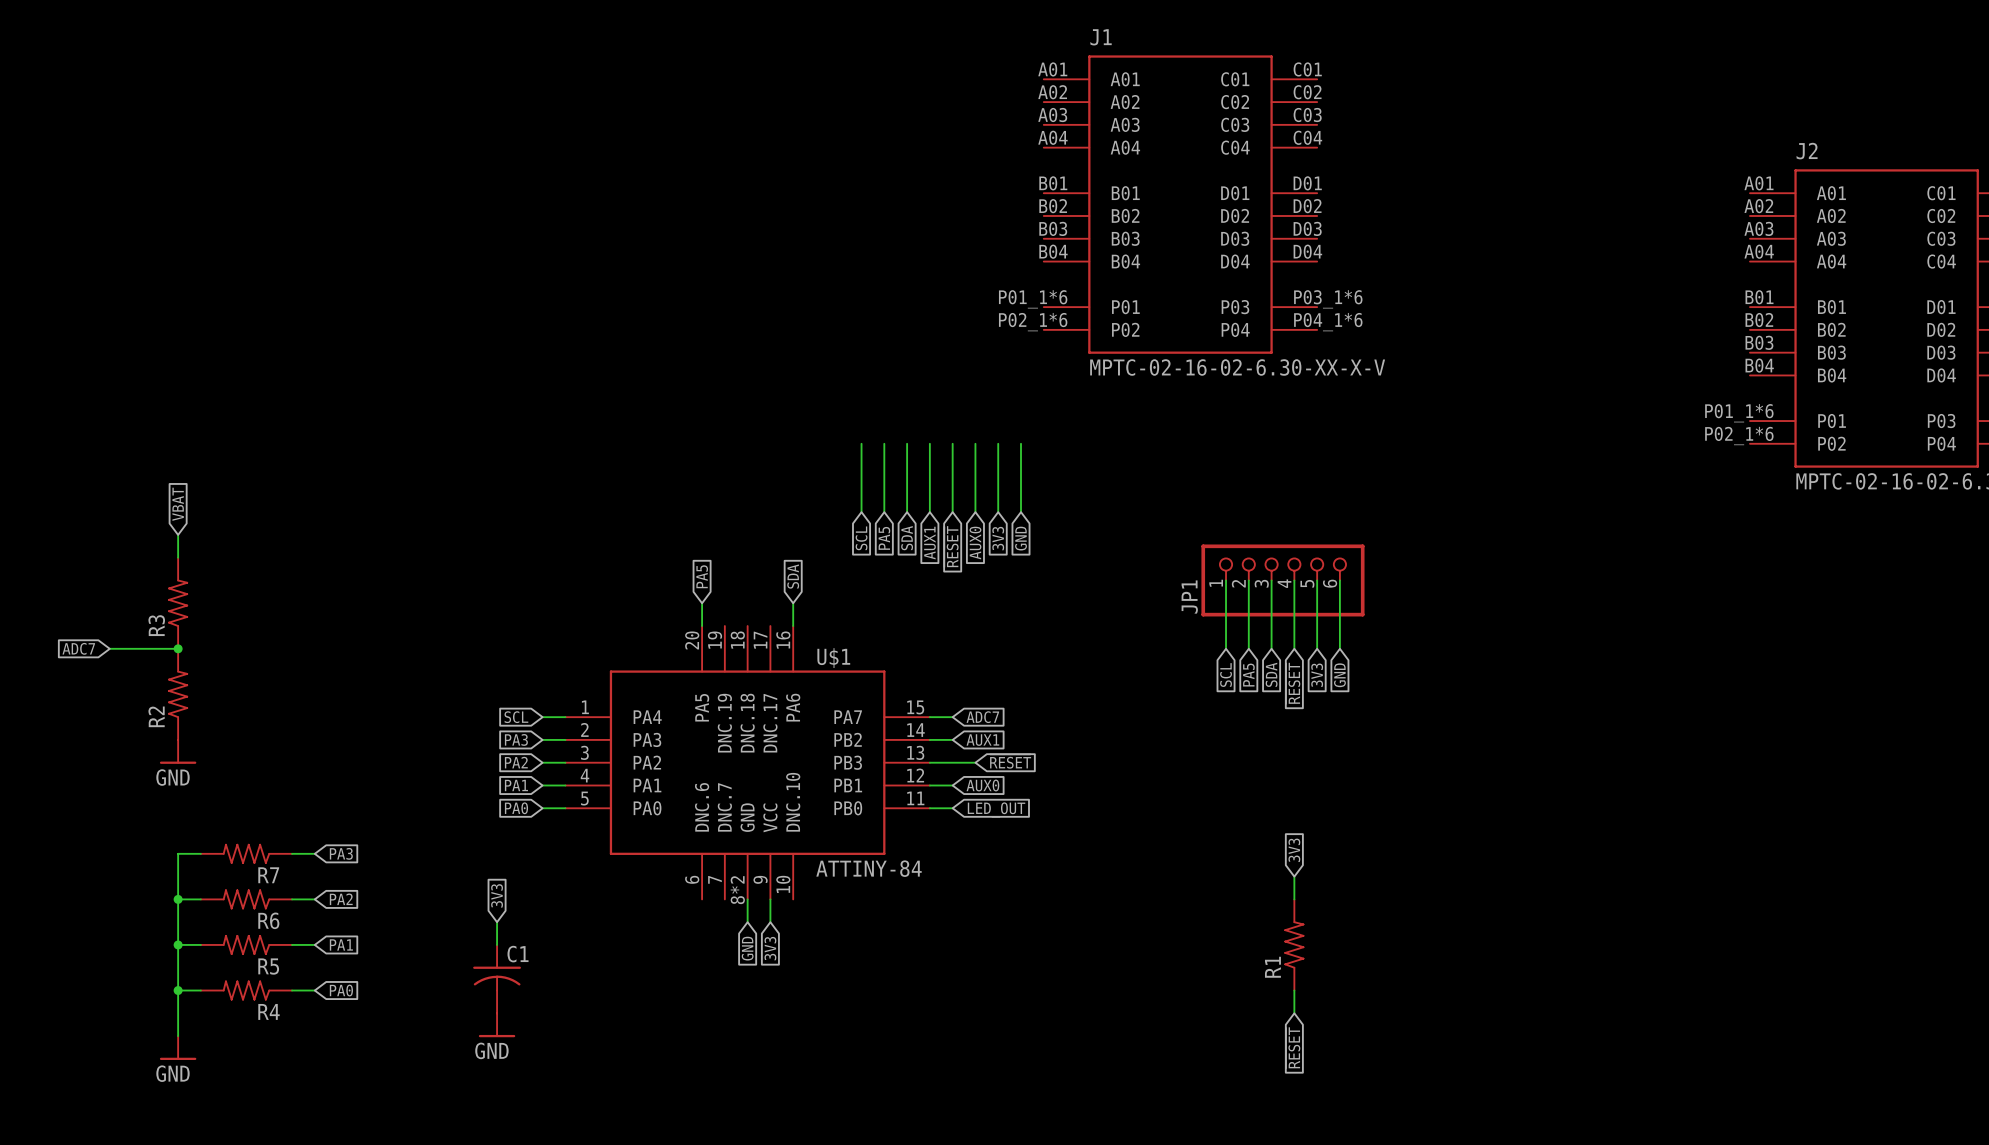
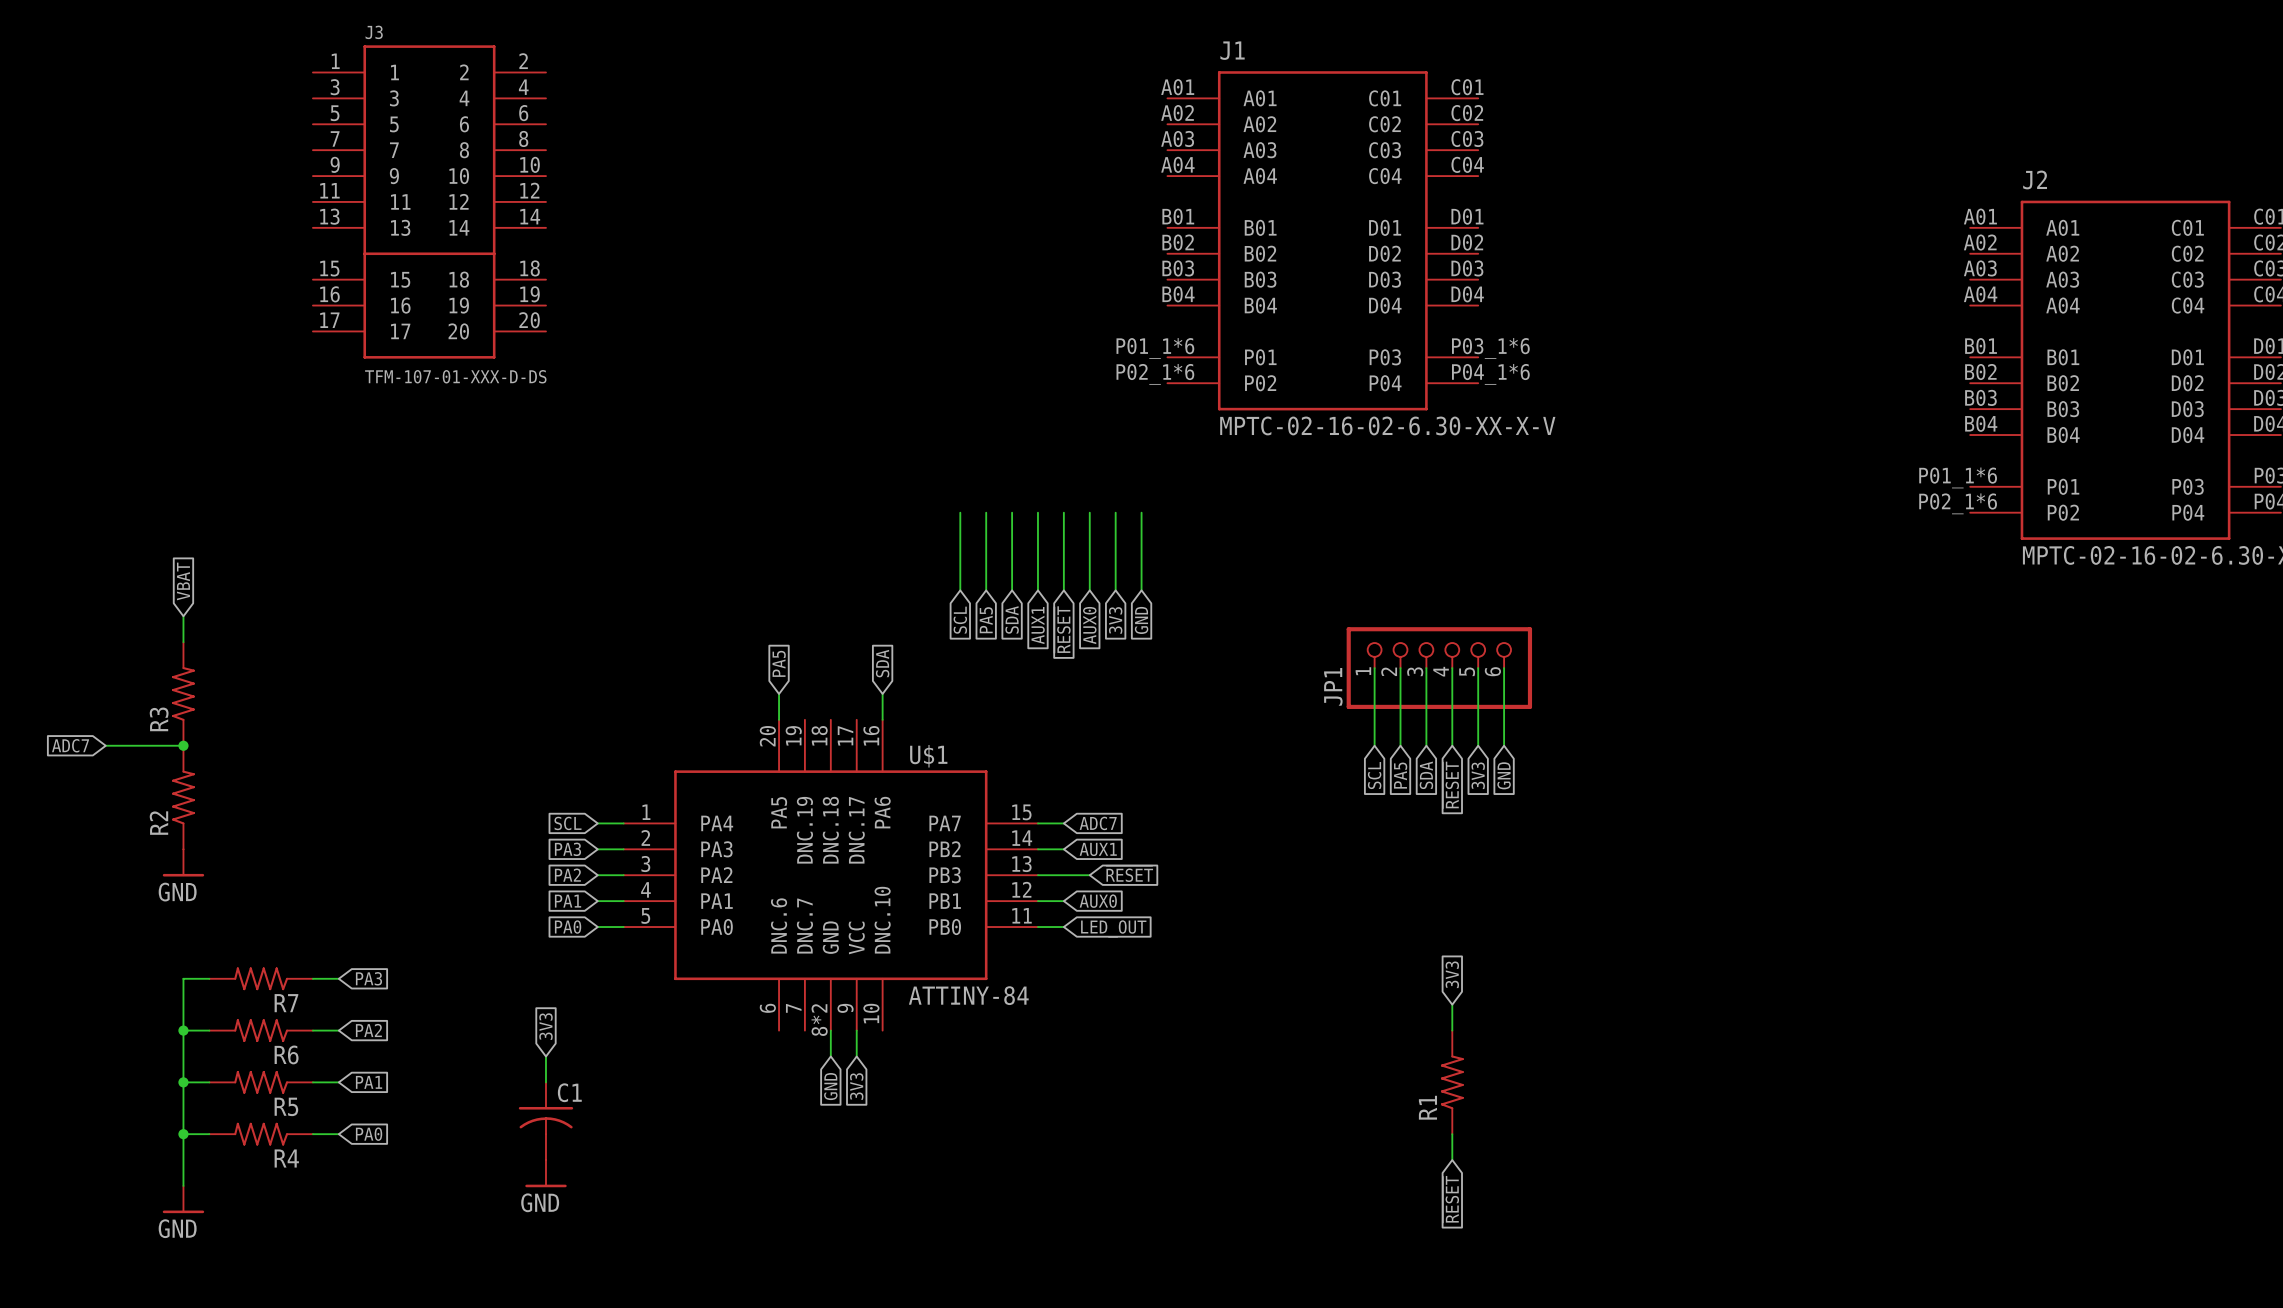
J3: none -> TFM-107-01-XXX-D-DS (429, 201)

